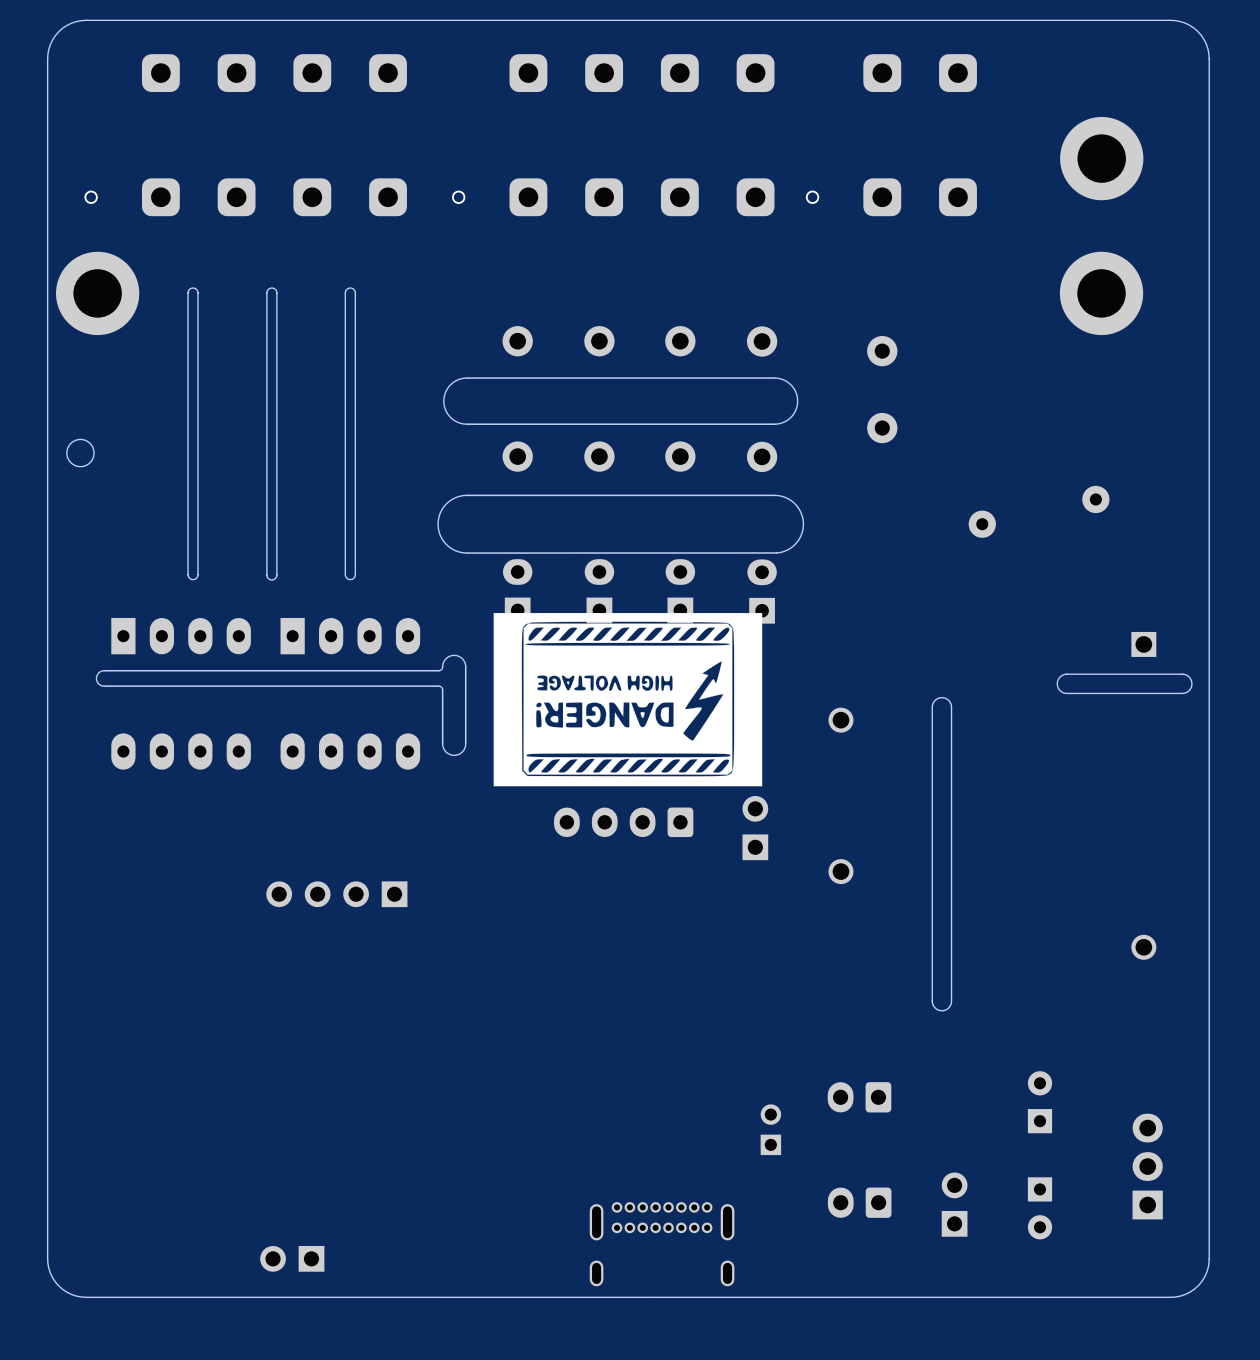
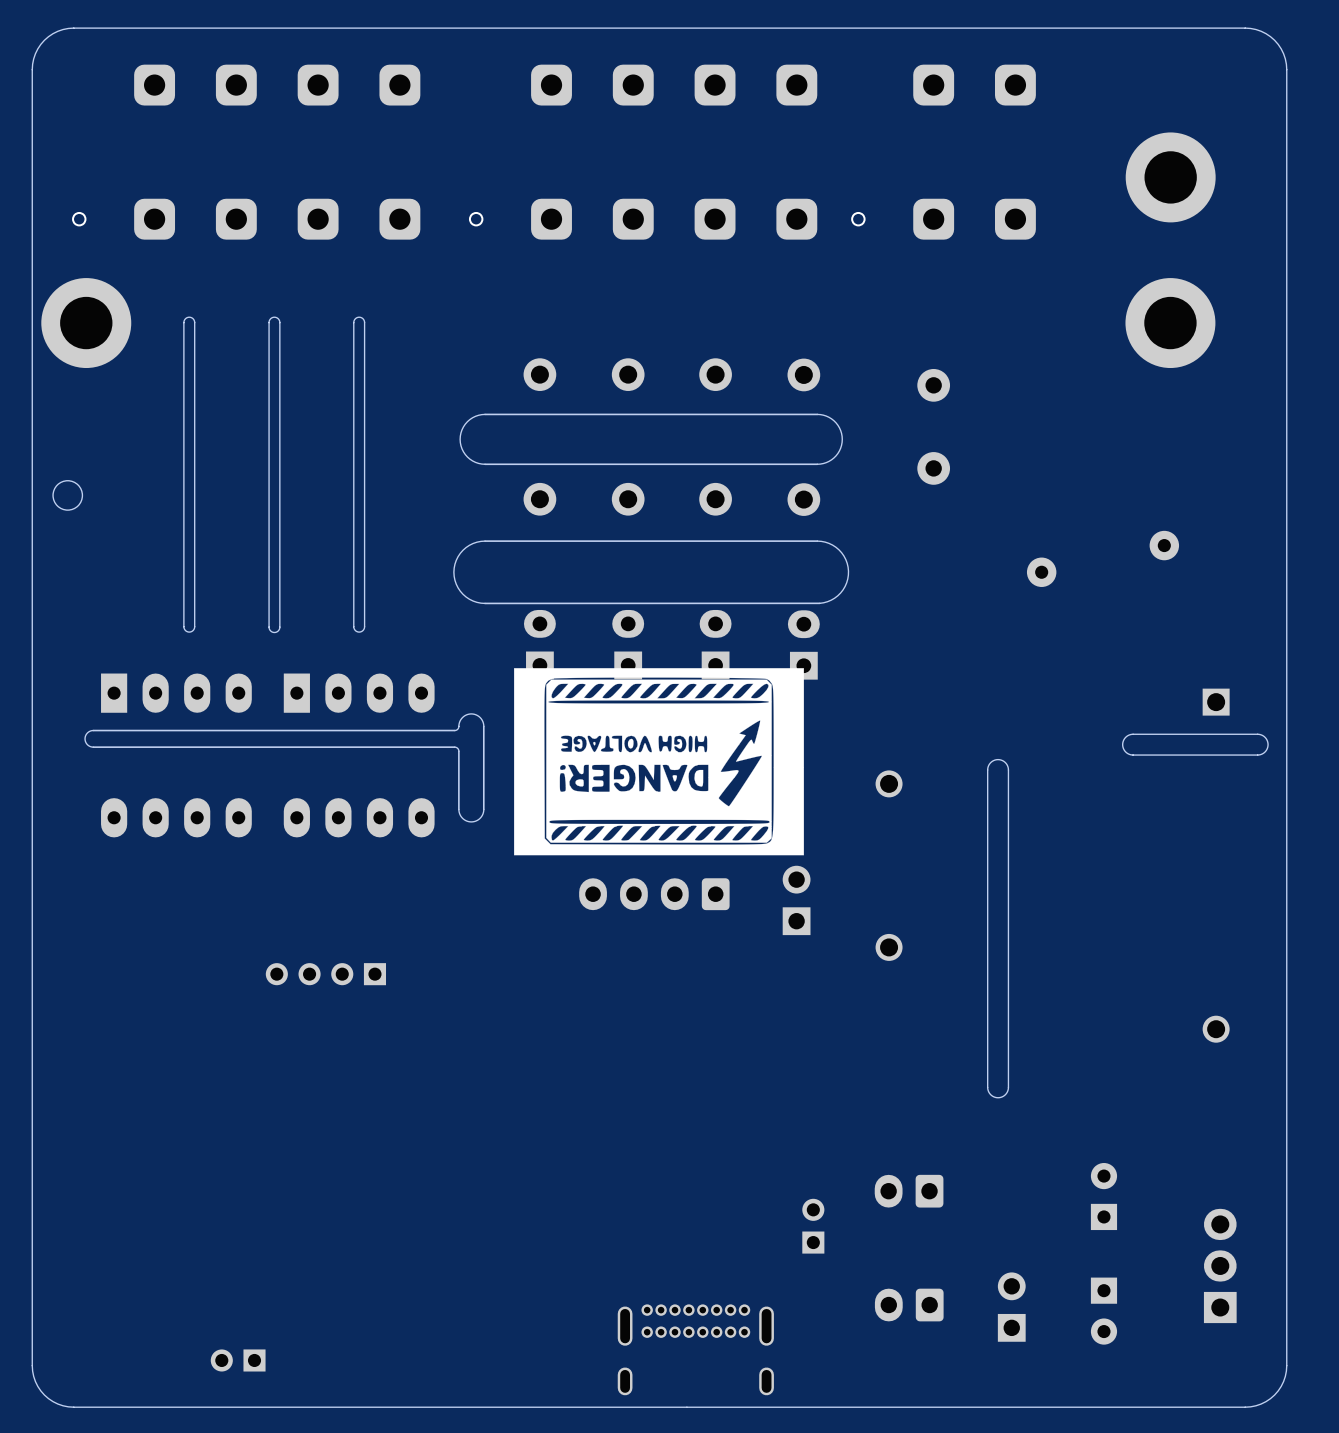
part: (336, 894) -> none
part: none -> (325, 974)
part: none -> (238, 1360)
part: (292, 1258) -> none

